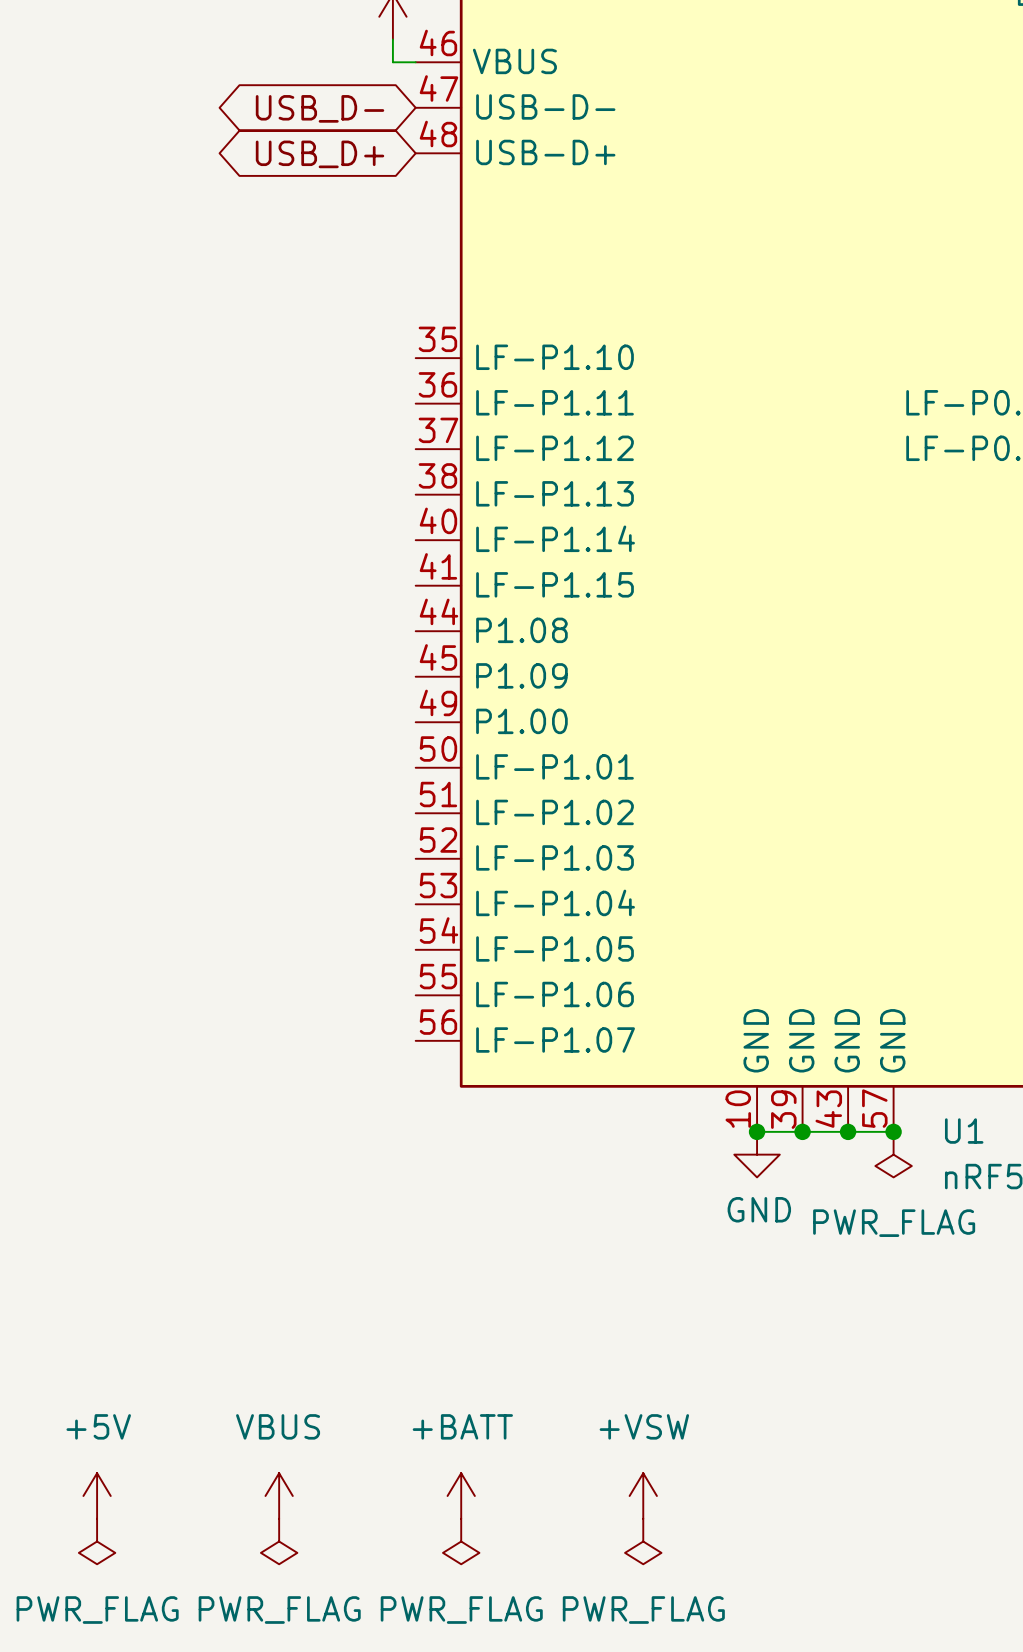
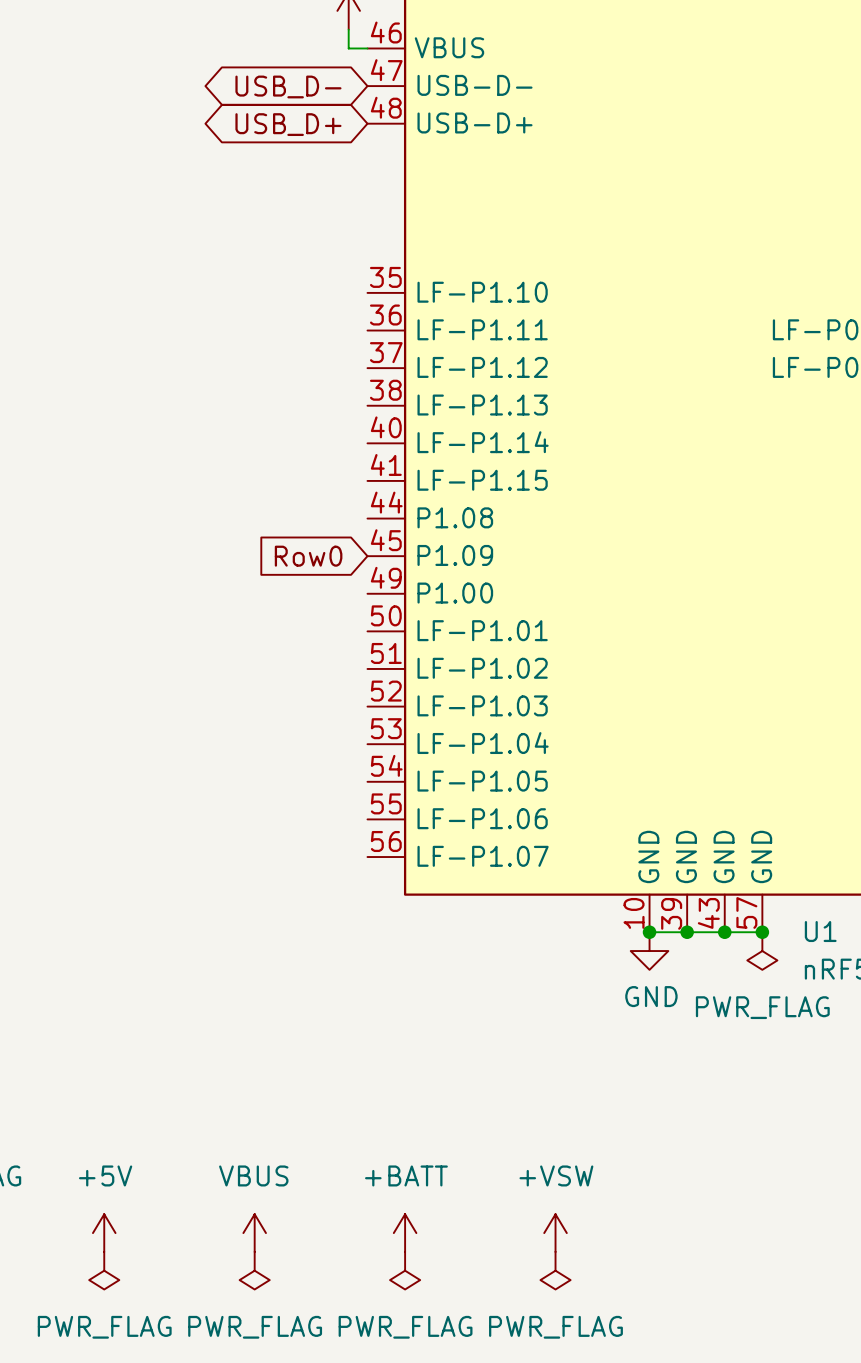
global label: none -> Row0 (308, 556)

